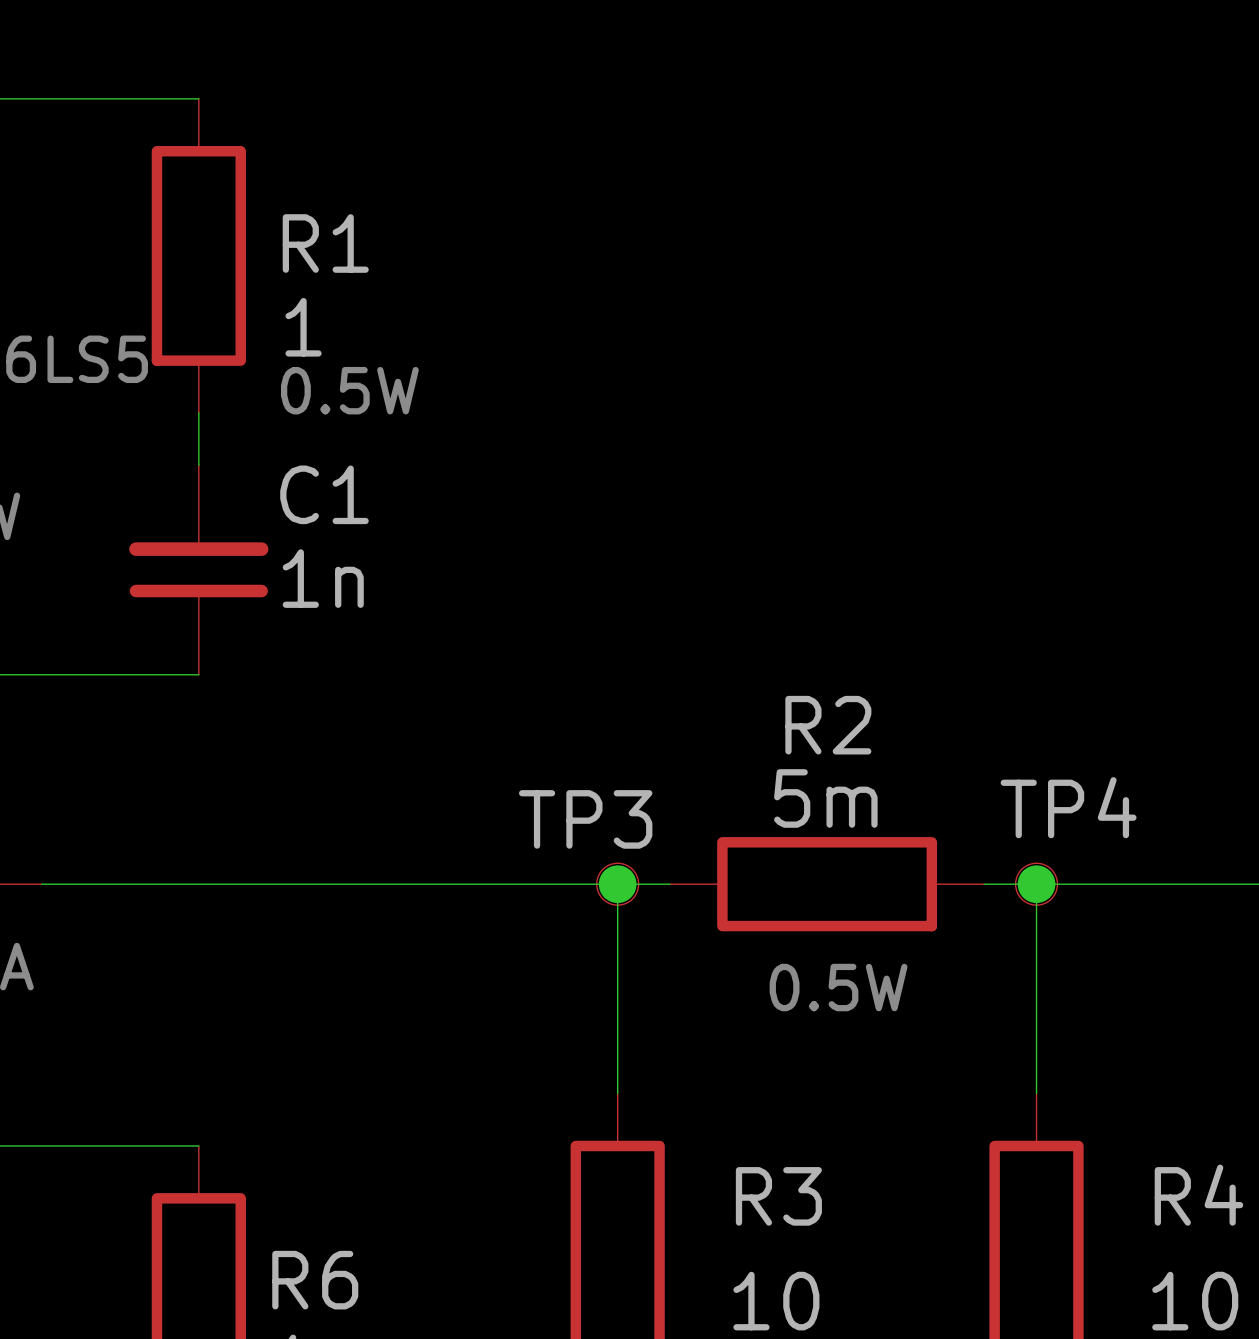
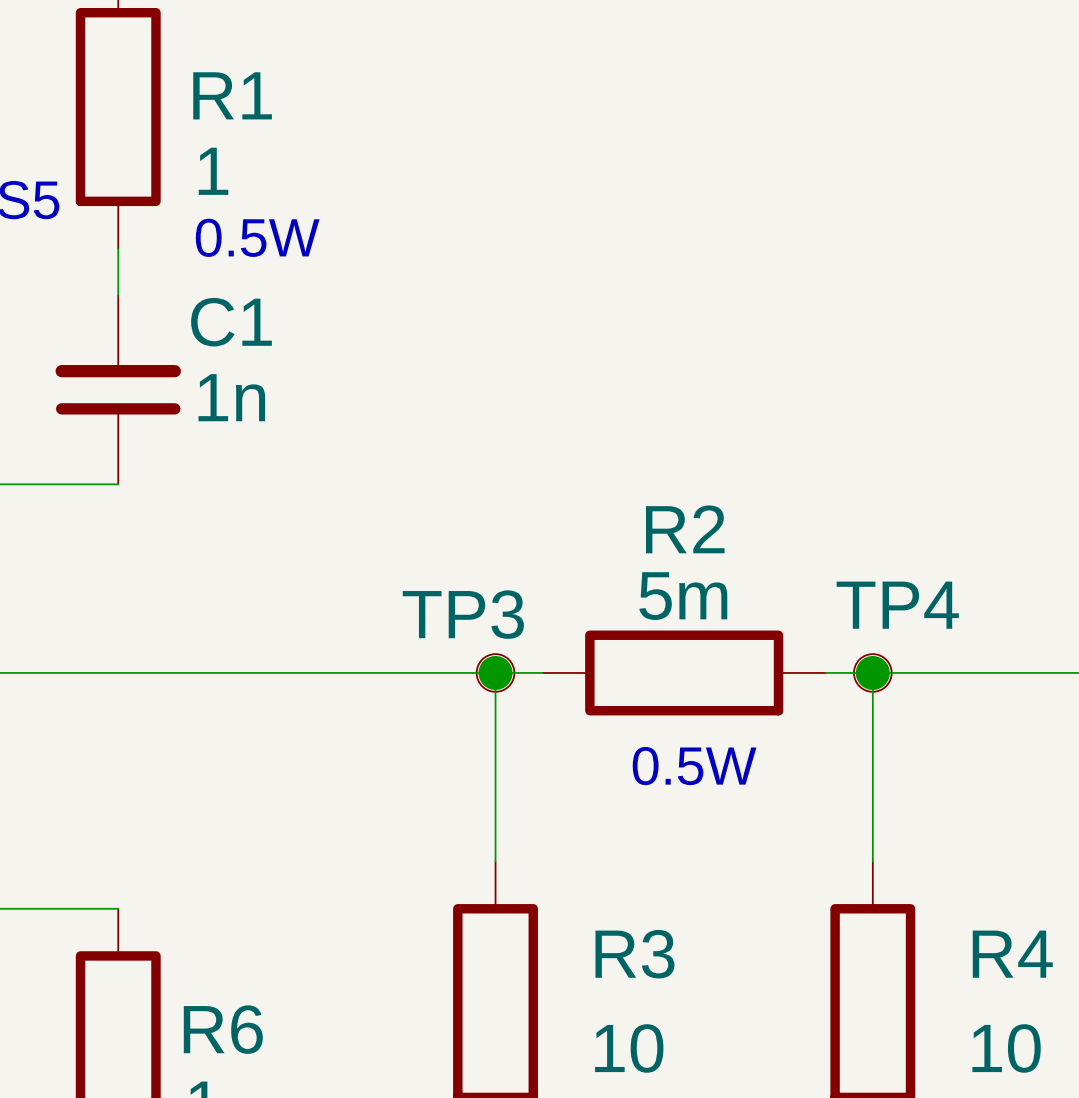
text position: 0.5W (349, 390) -> 0.5W (257, 237)

